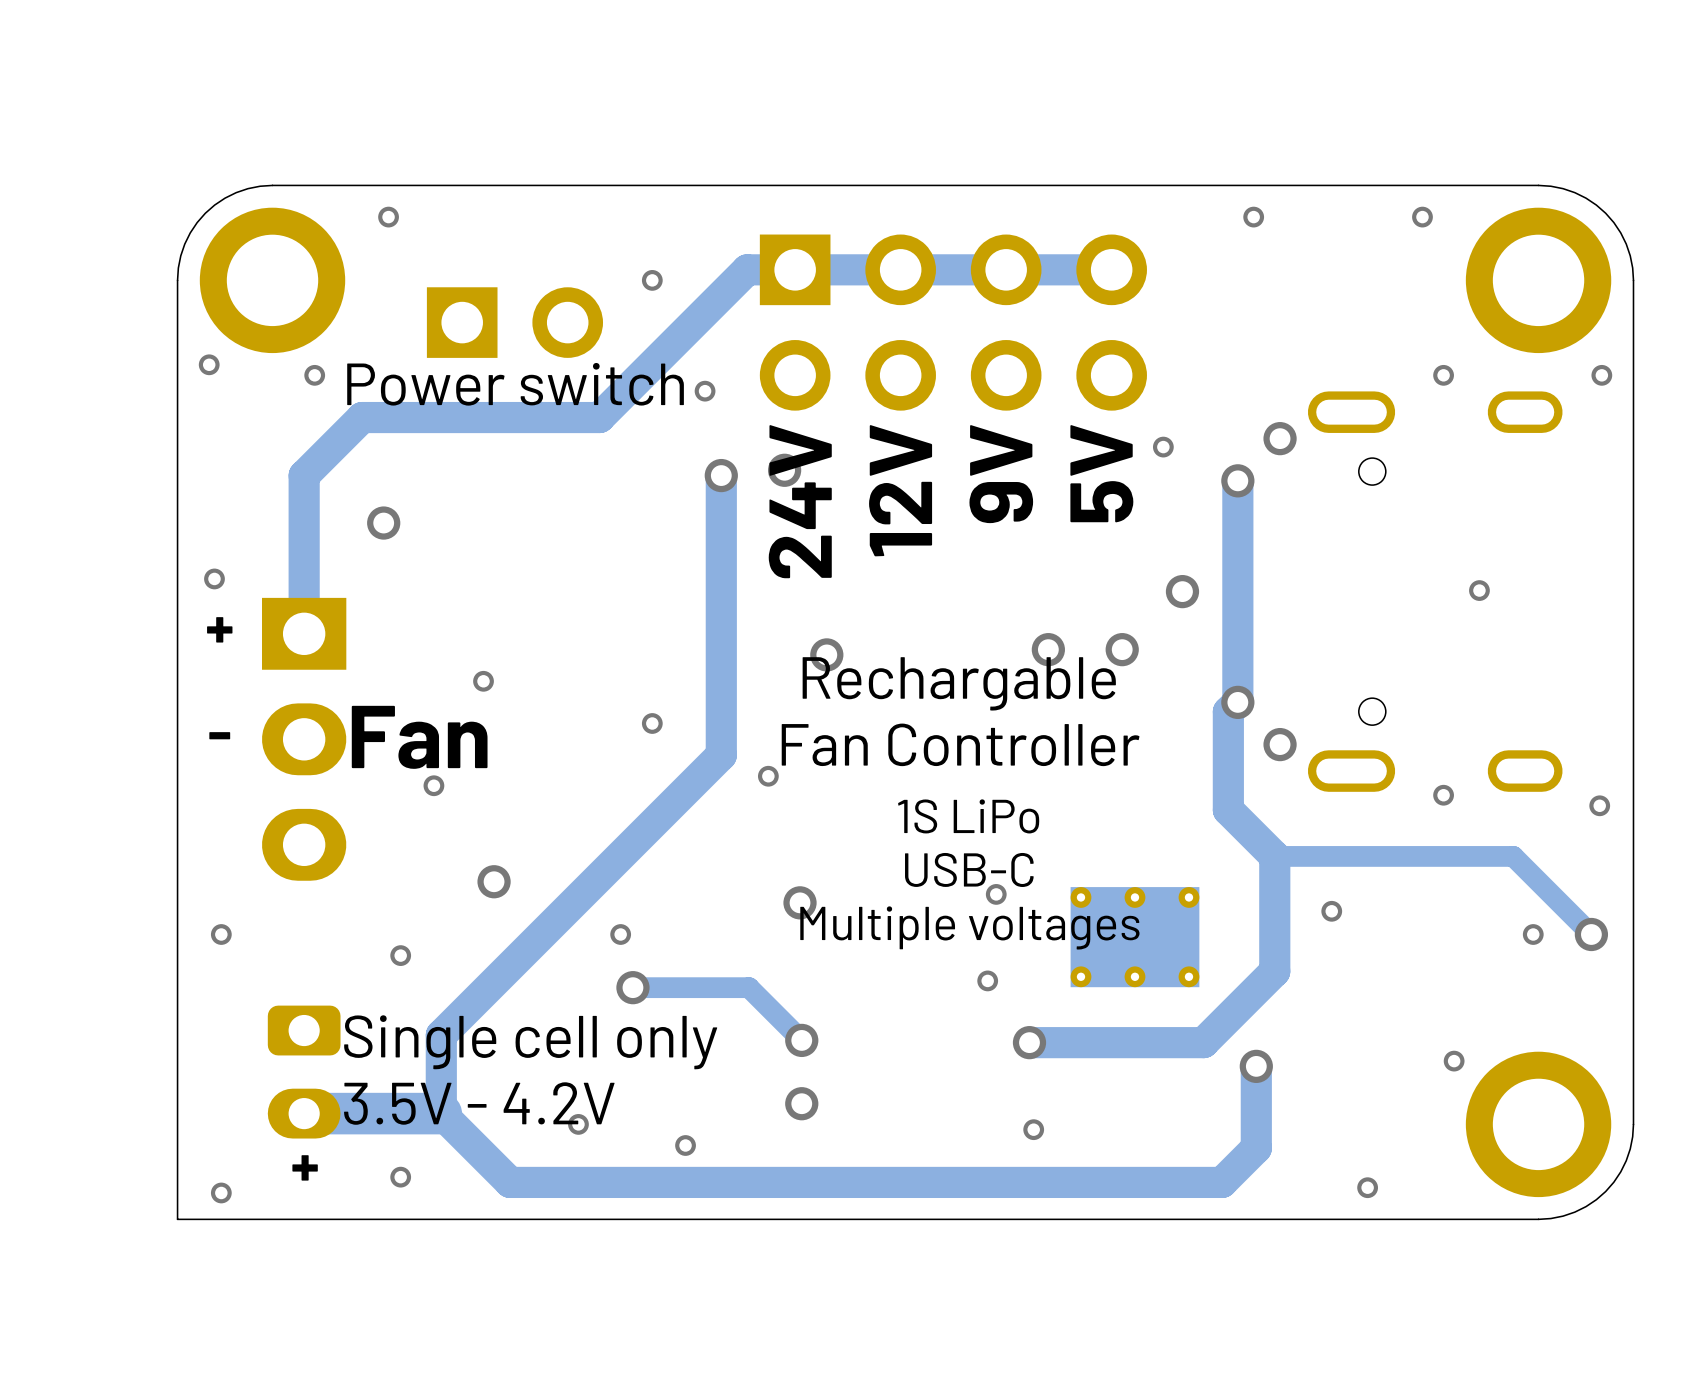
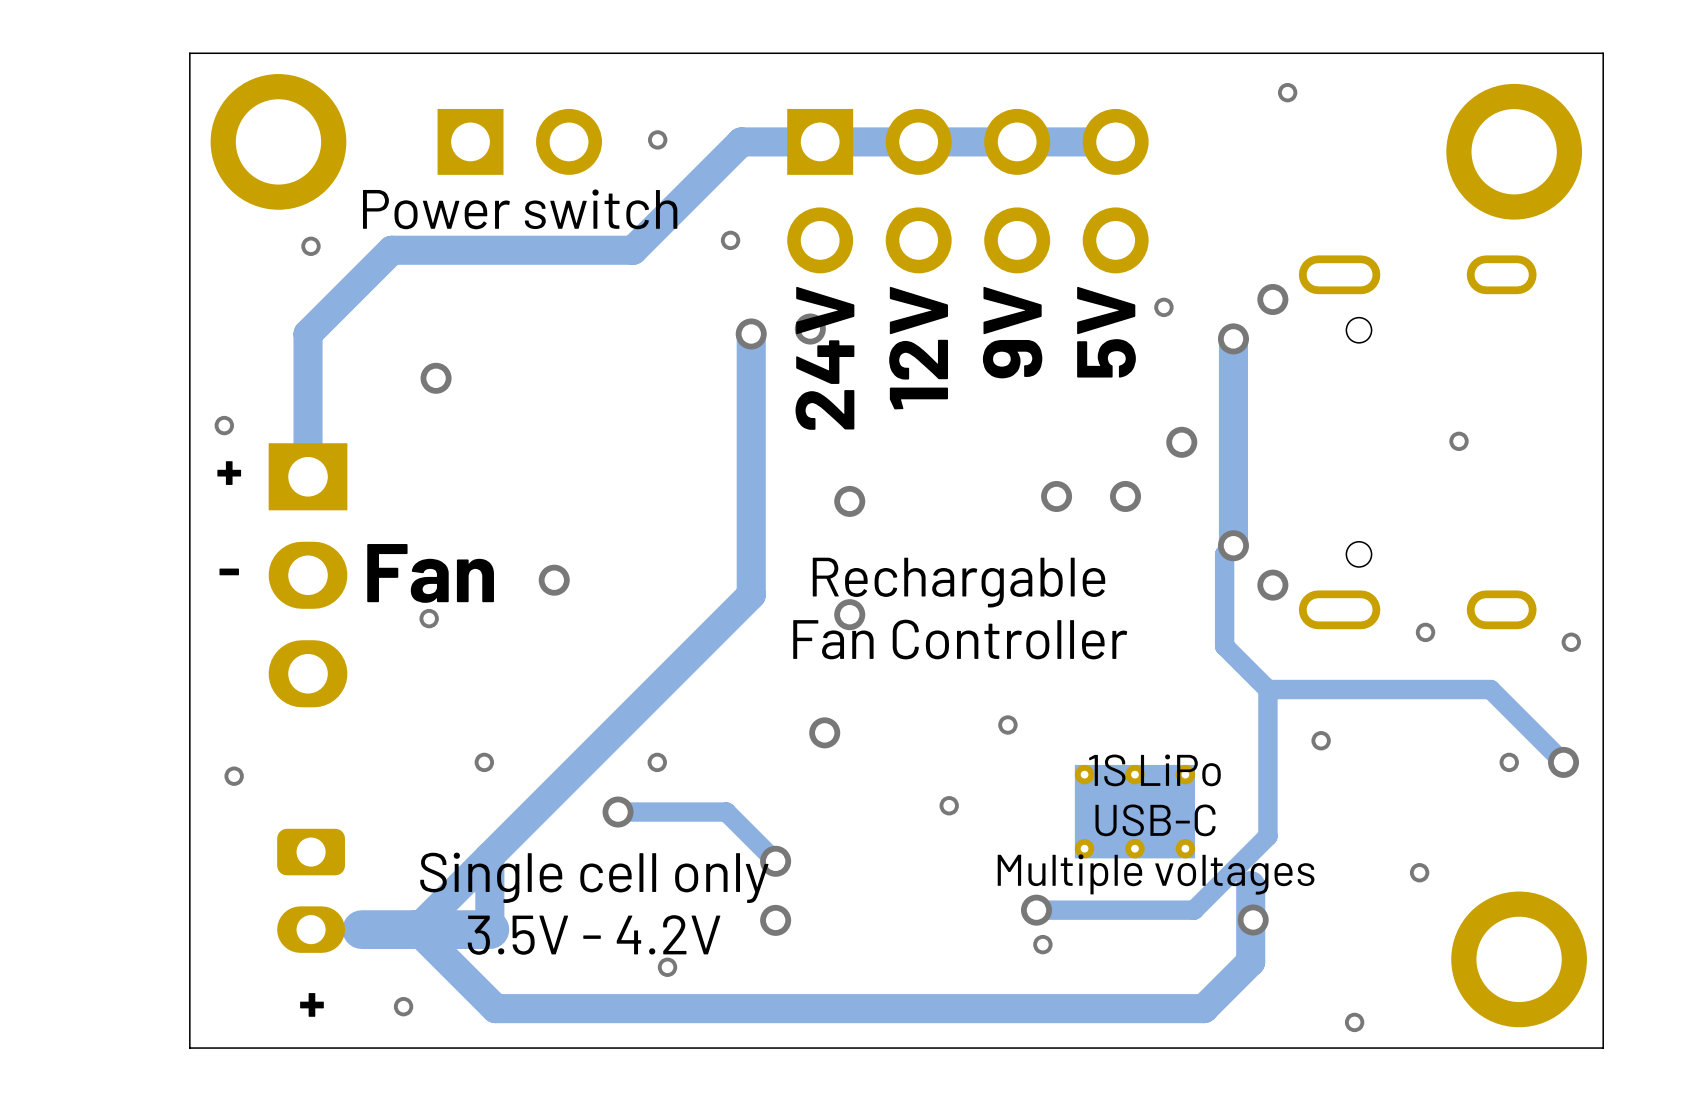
board edge: (1538, 185) (272, 185) (260, 186) (236, 192) (214, 205) (197, 222) (184, 244) (178, 267) (177, 280) (177, 1219) (1538, 1219) (1563, 1216) (1574, 1212) (1596, 1199) (1613, 1182) (1626, 1160) (1632, 1136) (1633, 1124) (1633, 280) (1630, 255) (1626, 244) (1613, 222) (1605, 213) (1586, 198) (1574, 192) (1550, 186) (1538, 185) -> (1603, 53) (1603, 1048) (189, 1048) (189, 53) (1603, 53)
via: (388, 217) -> none
via position: (1253, 217) -> (1287, 92)
via: (1422, 217) -> none
track: (747, 269) (599, 417) (362, 417) (304, 475) (304, 633) -> (775, 141) (741, 141) (633, 250) (391, 250) (308, 333) (308, 476)
part position: (272, 280) -> (278, 141)
via position: (652, 280) -> (657, 139)
part position: (514, 322) -> (519, 141)
via: (209, 364) -> none
via: (314, 375) -> none
via: (1443, 375) -> none
via: (1601, 375) -> none
via: none -> (310, 246)
text position: Power switch (515, 384) -> Power switch (520, 209)
via position: (705, 391) -> (730, 240)
via position: (214, 578) -> (224, 425)
text position: + (219, 629) -> + (229, 473)
via: (483, 681) -> none
text position: Rechargable (959, 683) -> Rechargable (958, 582)
track width: thick (1237, 702) (1228, 711) (1228, 810) (1274, 856) (1274, 971) -> thin (1233, 545) (1224, 554) (1224, 646) (1267, 689) (1267, 796)
via: (652, 723) -> none
text position: - (219, 735) -> - (229, 571)
text position: Fan (419, 737) -> Fan (430, 573)
part position: (304, 739) -> (308, 575)
via: none -> (554, 580)
text position: Fan Controller (960, 744) -> Fan Controller (960, 639)
via: (768, 776) -> none
via: none -> (849, 614)
via position: (433, 785) -> (429, 618)
text position: 1S LiPo (968, 816) -> 1S LiPo (1154, 770)
text position: USB-C (969, 869) -> USB-C (1155, 820)
via: (494, 881) -> none
text position: Multiple voltages (969, 927) -> Multiple voltages (1156, 874)
via position: (221, 934) -> (234, 776)
part position: (1134, 937) -> (1134, 811)
via position: (400, 955) -> (484, 762)
track: (1274, 971) (1203, 1042) (1029, 1042) -> (1267, 796) (1267, 836) (1194, 910) (1036, 910)
via position: (987, 980) -> (949, 805)
track: none -> (668, 812) (618, 812)
via position: (632, 987) -> (618, 812)
track: (694, 987) (749, 987) (801, 1040) -> (726, 812) (775, 861)
via: none -> (775, 861)
via: (801, 1040) -> none
text position: Single cell only (530, 1042) -> Single cell only (594, 877)
via position: (1029, 1042) -> (1036, 910)
via position: (1454, 1061) -> (1419, 872)
via position: (1256, 1066) -> (1253, 920)
part position: (304, 1072) -> (311, 890)
text position: 3.5V - 4.2V (479, 1103) -> 3.5V - 4.2V (594, 934)
via: none -> (775, 920)
via: (801, 1103) -> none
track: (441, 1113) (510, 1182) (1222, 1182) -> (489, 856) (416, 929) (495, 1008) (1203, 1008) (1218, 993)
via: (578, 1124) -> none
part position: (1538, 1124) -> (1519, 959)
via: (685, 1145) -> none
via: none -> (667, 967)
text position: + (305, 1167) -> + (311, 1004)
via position: (400, 1177) -> (403, 1006)
via position: (1367, 1187) -> (1354, 1022)
via: (221, 1192) -> none

